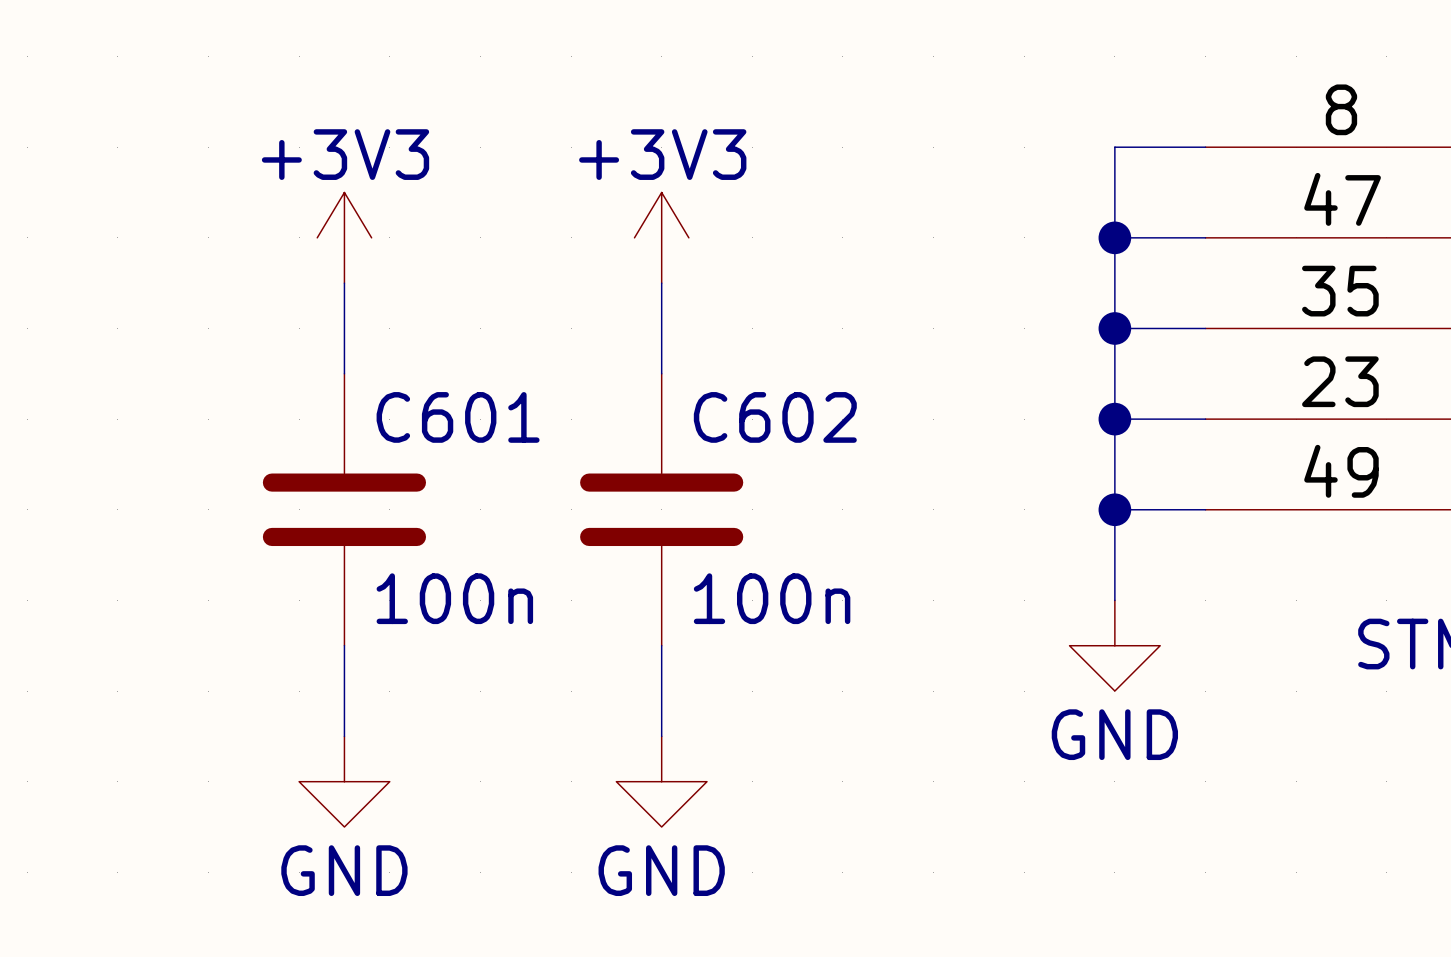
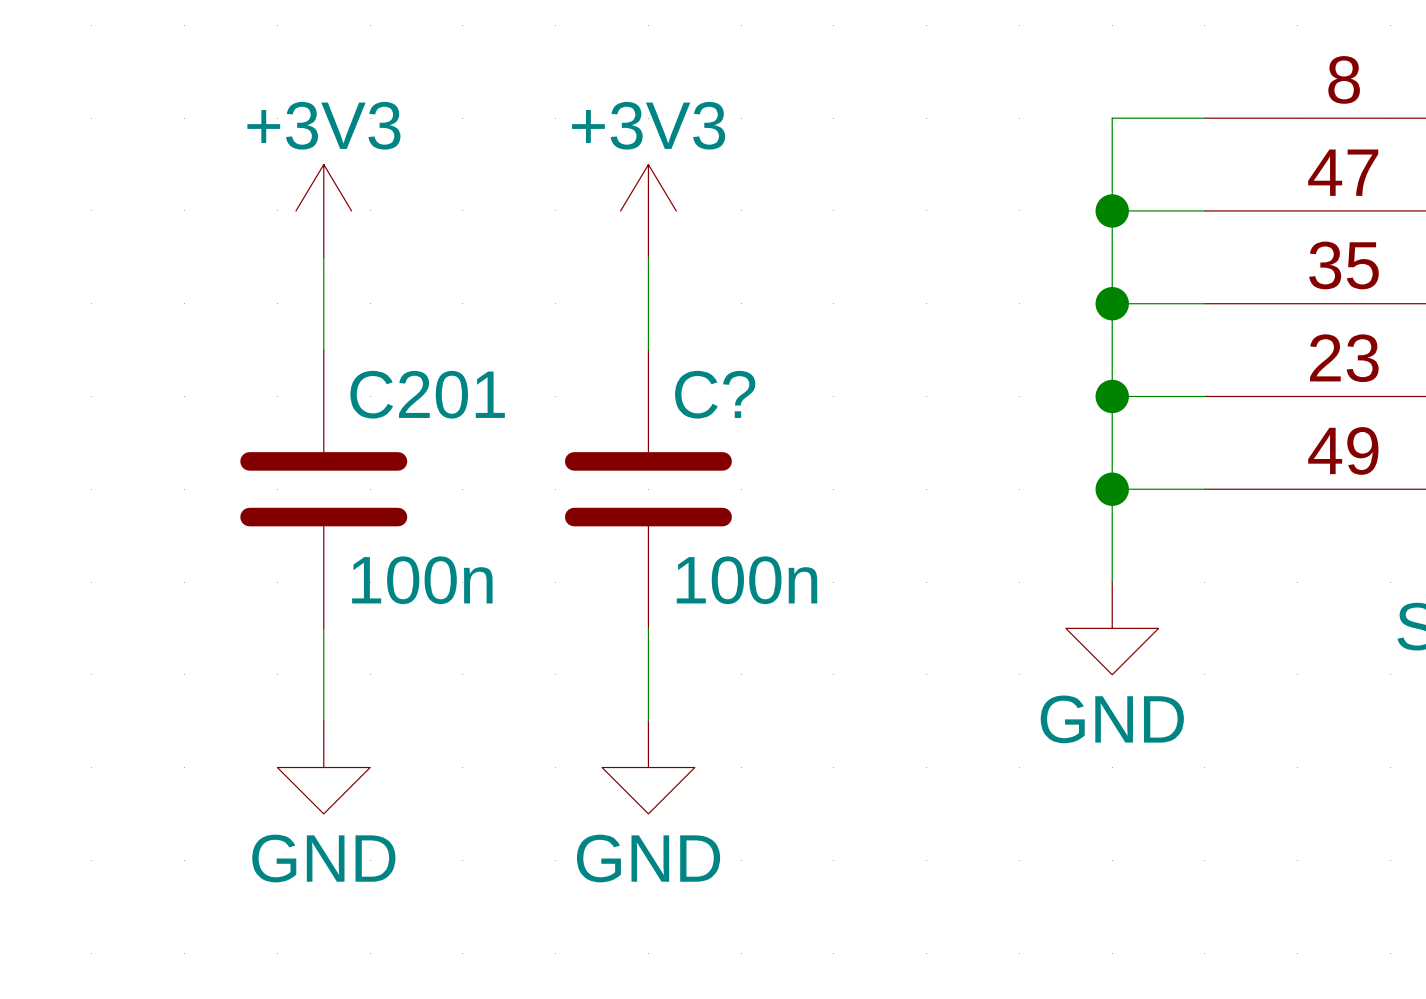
C601 name: C601 (458, 417) -> C201 (427, 394)
C602 name: C602 (775, 417) -> C? (715, 394)

